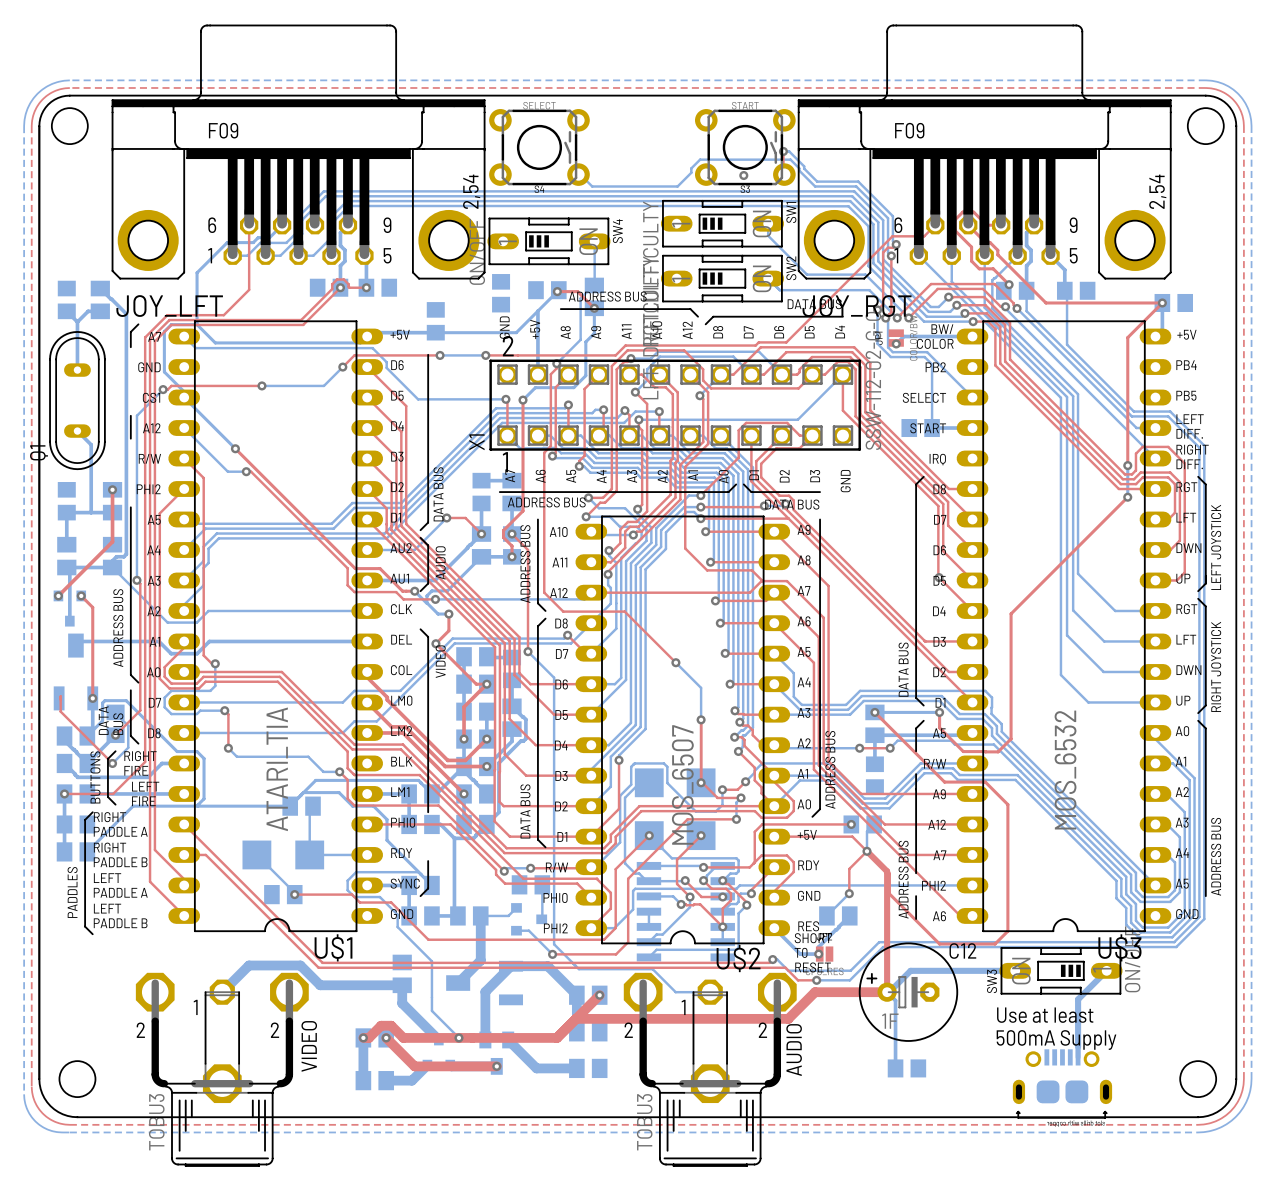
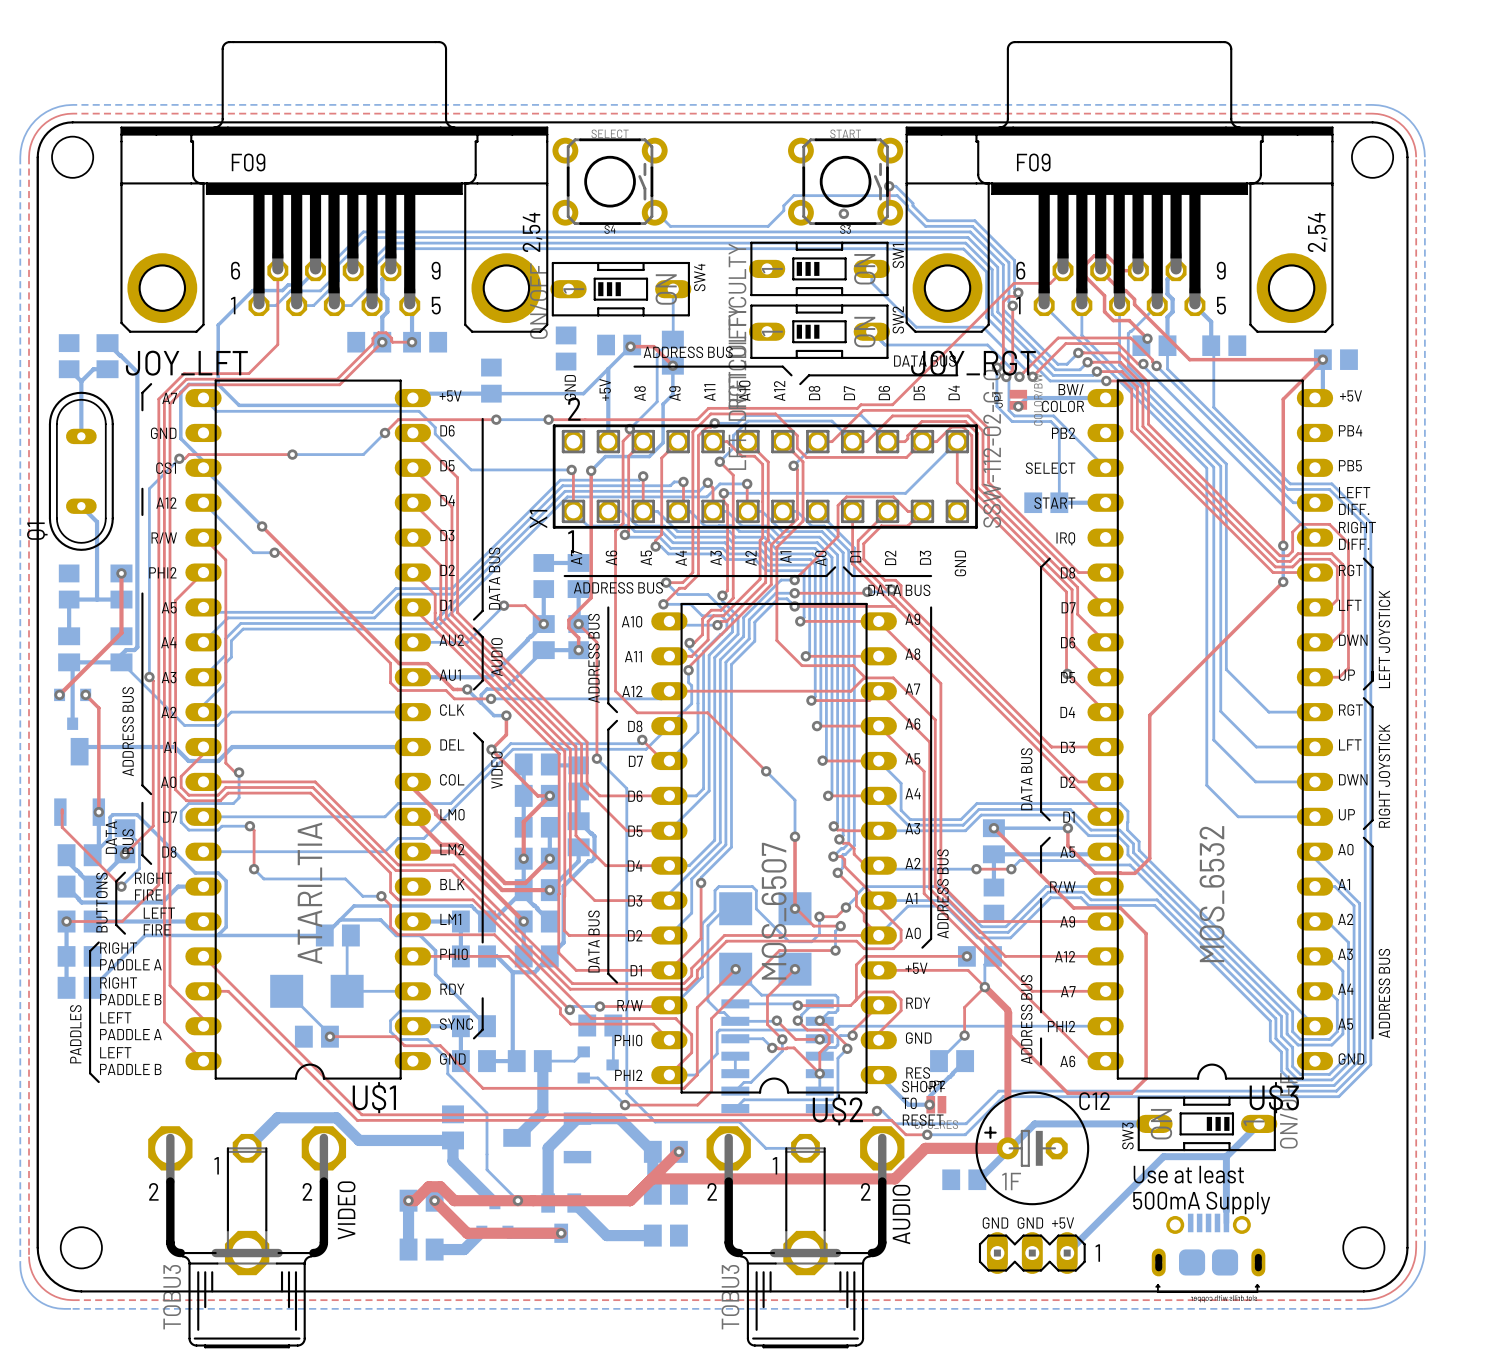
bottom track: (888, 993) (895, 1000) (895, 1068) -> (1009, 1149) (977, 1179)
bottom track: none -> (1226, 1156) (1163, 1156) (1067, 1253)
text: none -> GND (995, 1223)
text: none -> GND (1030, 1223)
text: none -> +5V (1063, 1223)
part position: (906, 1068) -> (964, 1179)
part: none -> (1032, 1253)

